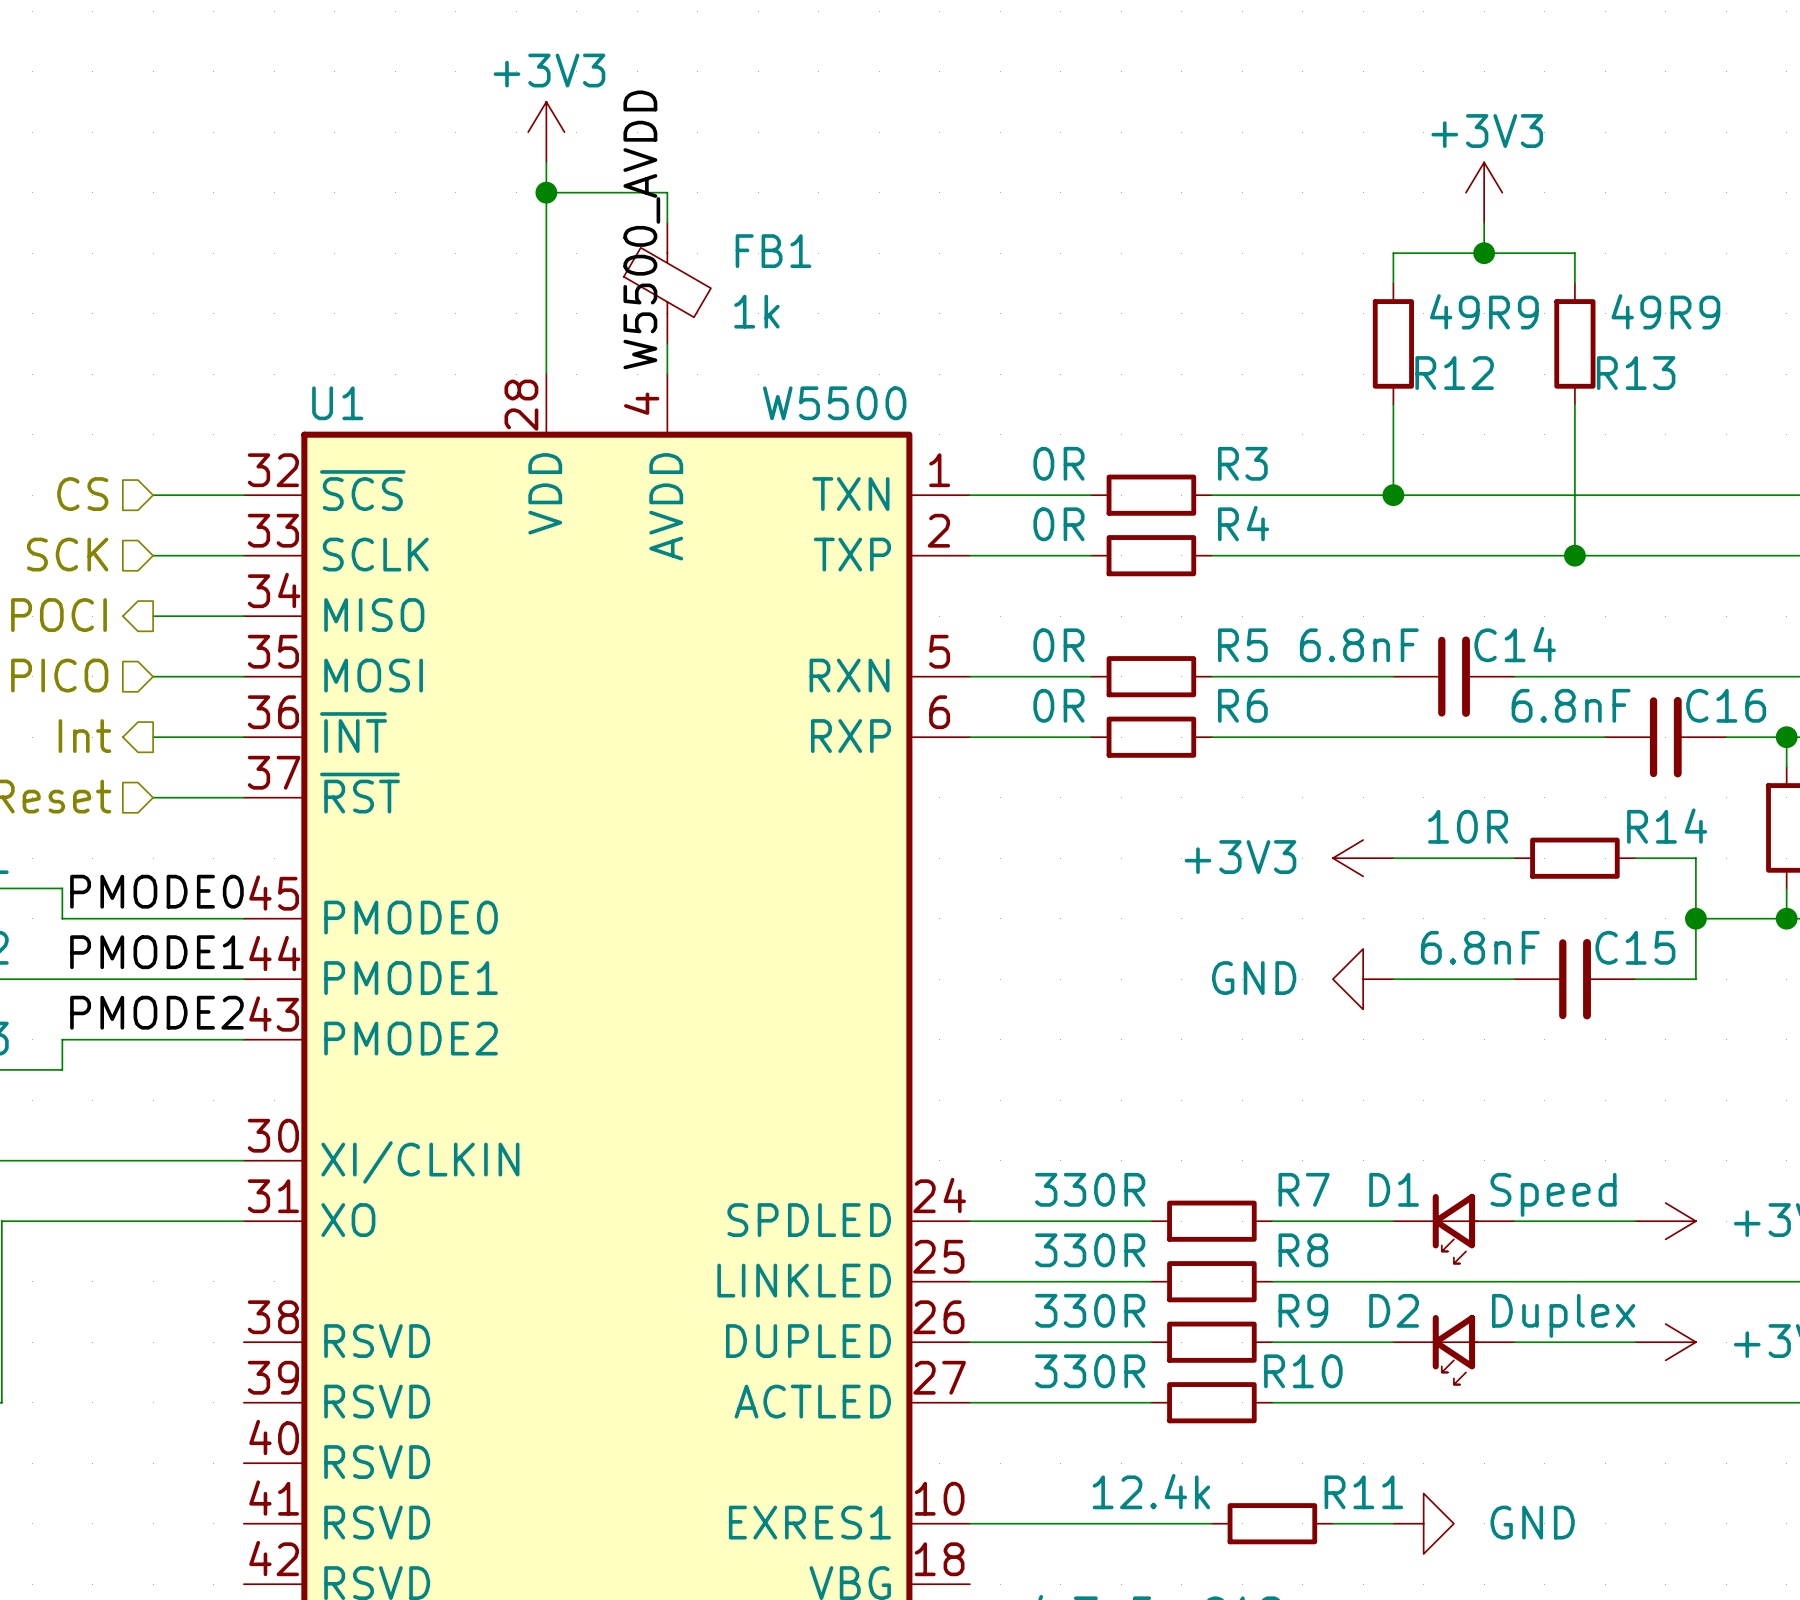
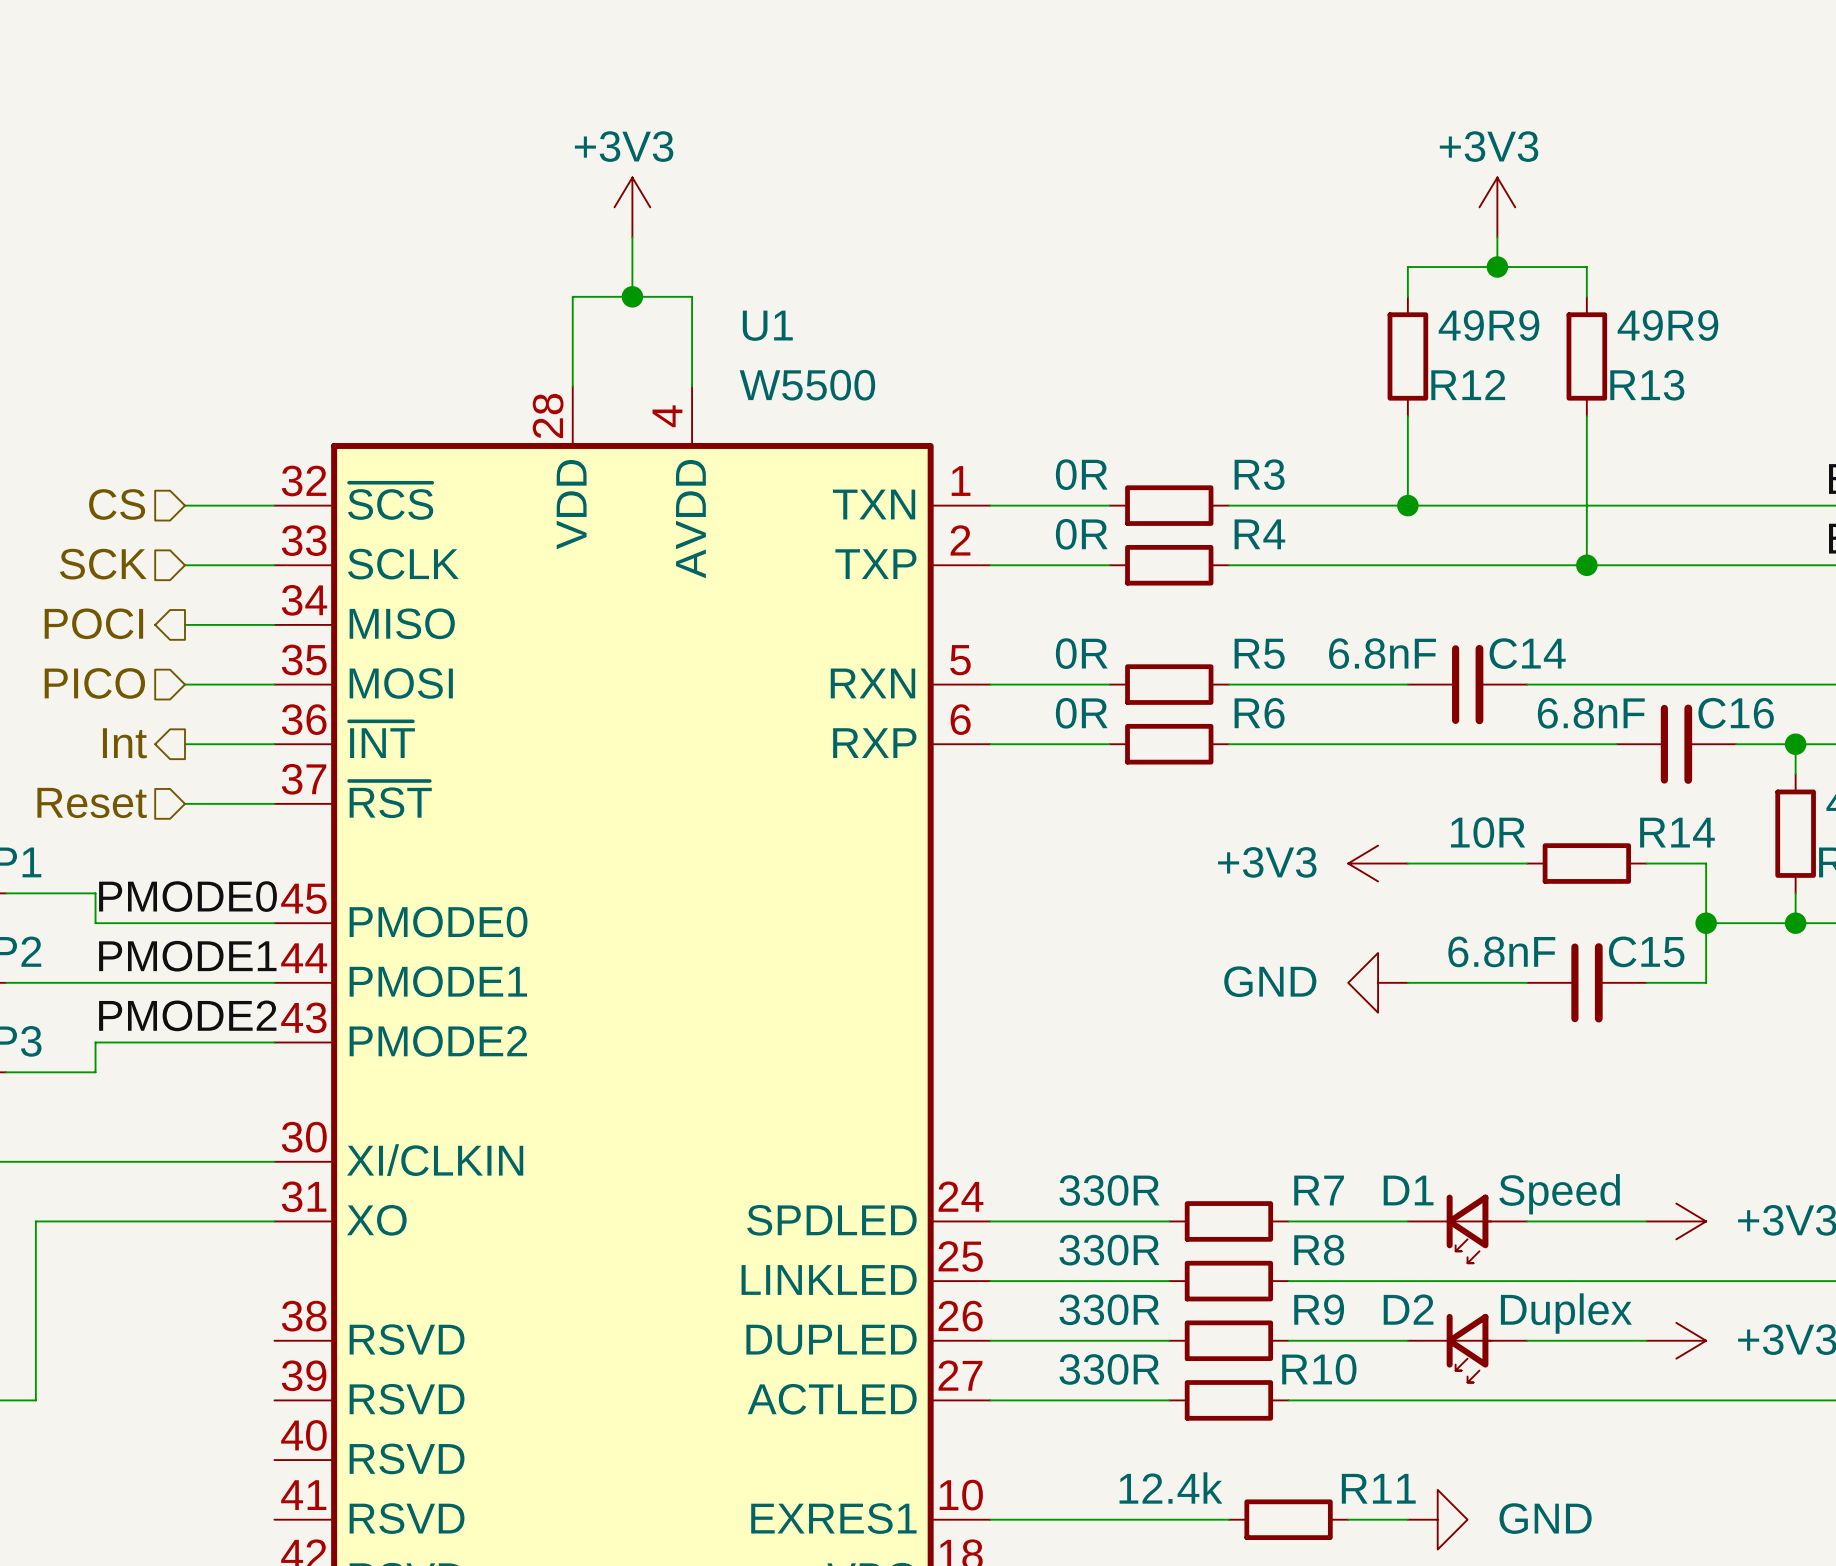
power symbol position: +3V3 (546, 132) -> +3V3 (632, 207)
wire: (546, 162) (546, 283) -> (692, 356) (692, 296) (572, 296)
wire: (546, 192) (667, 192) (667, 222) -> none
junction position: (546, 192) -> (632, 296)
wire: none -> (632, 237) (632, 296)
label: W5500_AVDD (641, 229) -> none
FB1: 1k (667, 283) -> none
U1 name position: U1 (337, 403) -> U1 (767, 325)
U1 value position: W5500 (834, 403) -> W5500 (807, 385)

